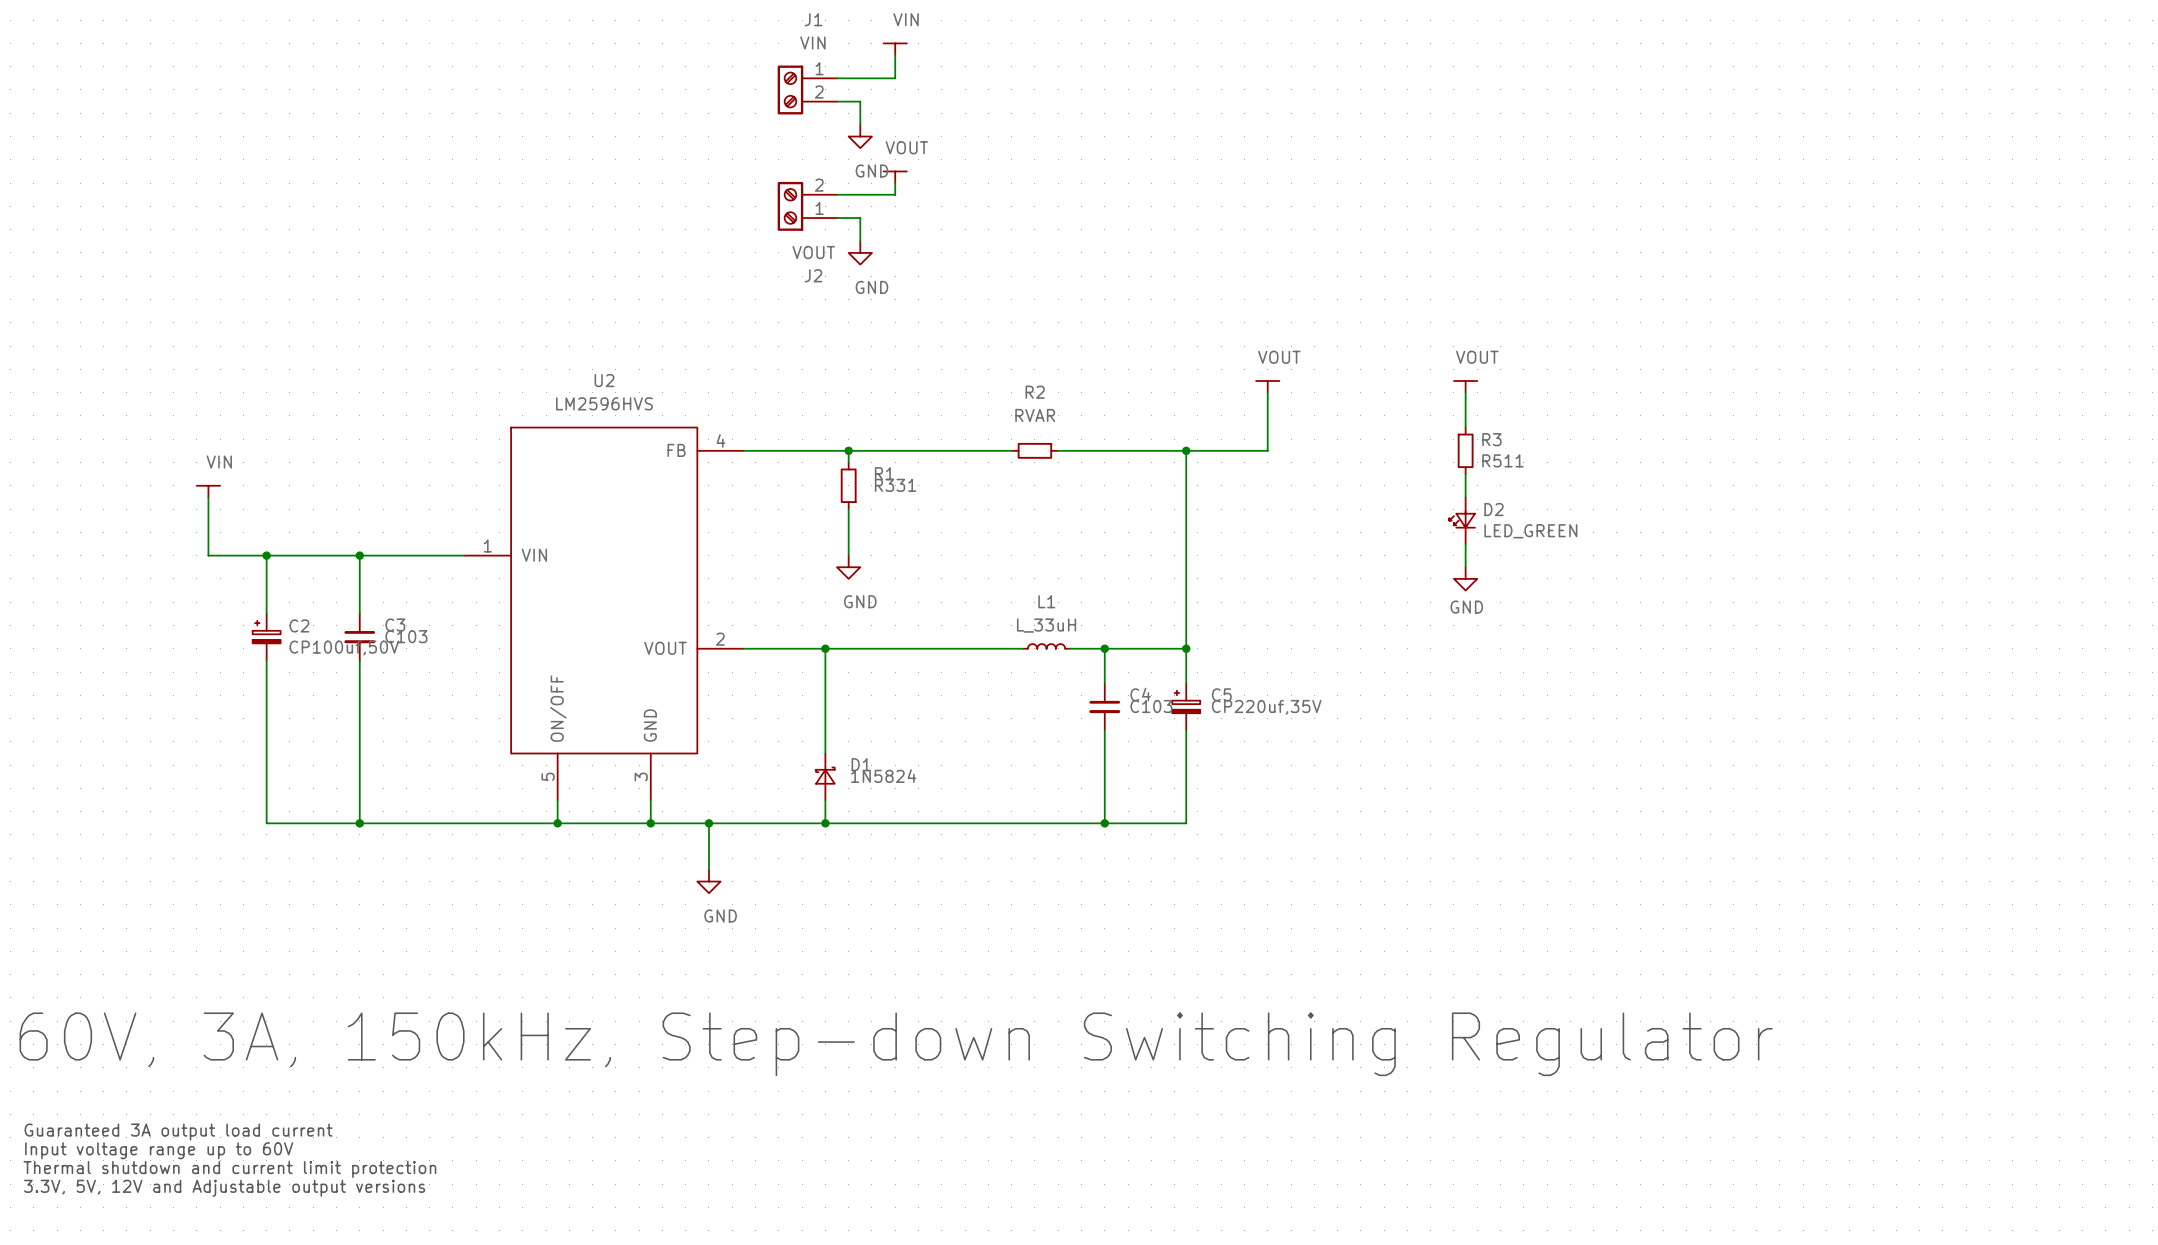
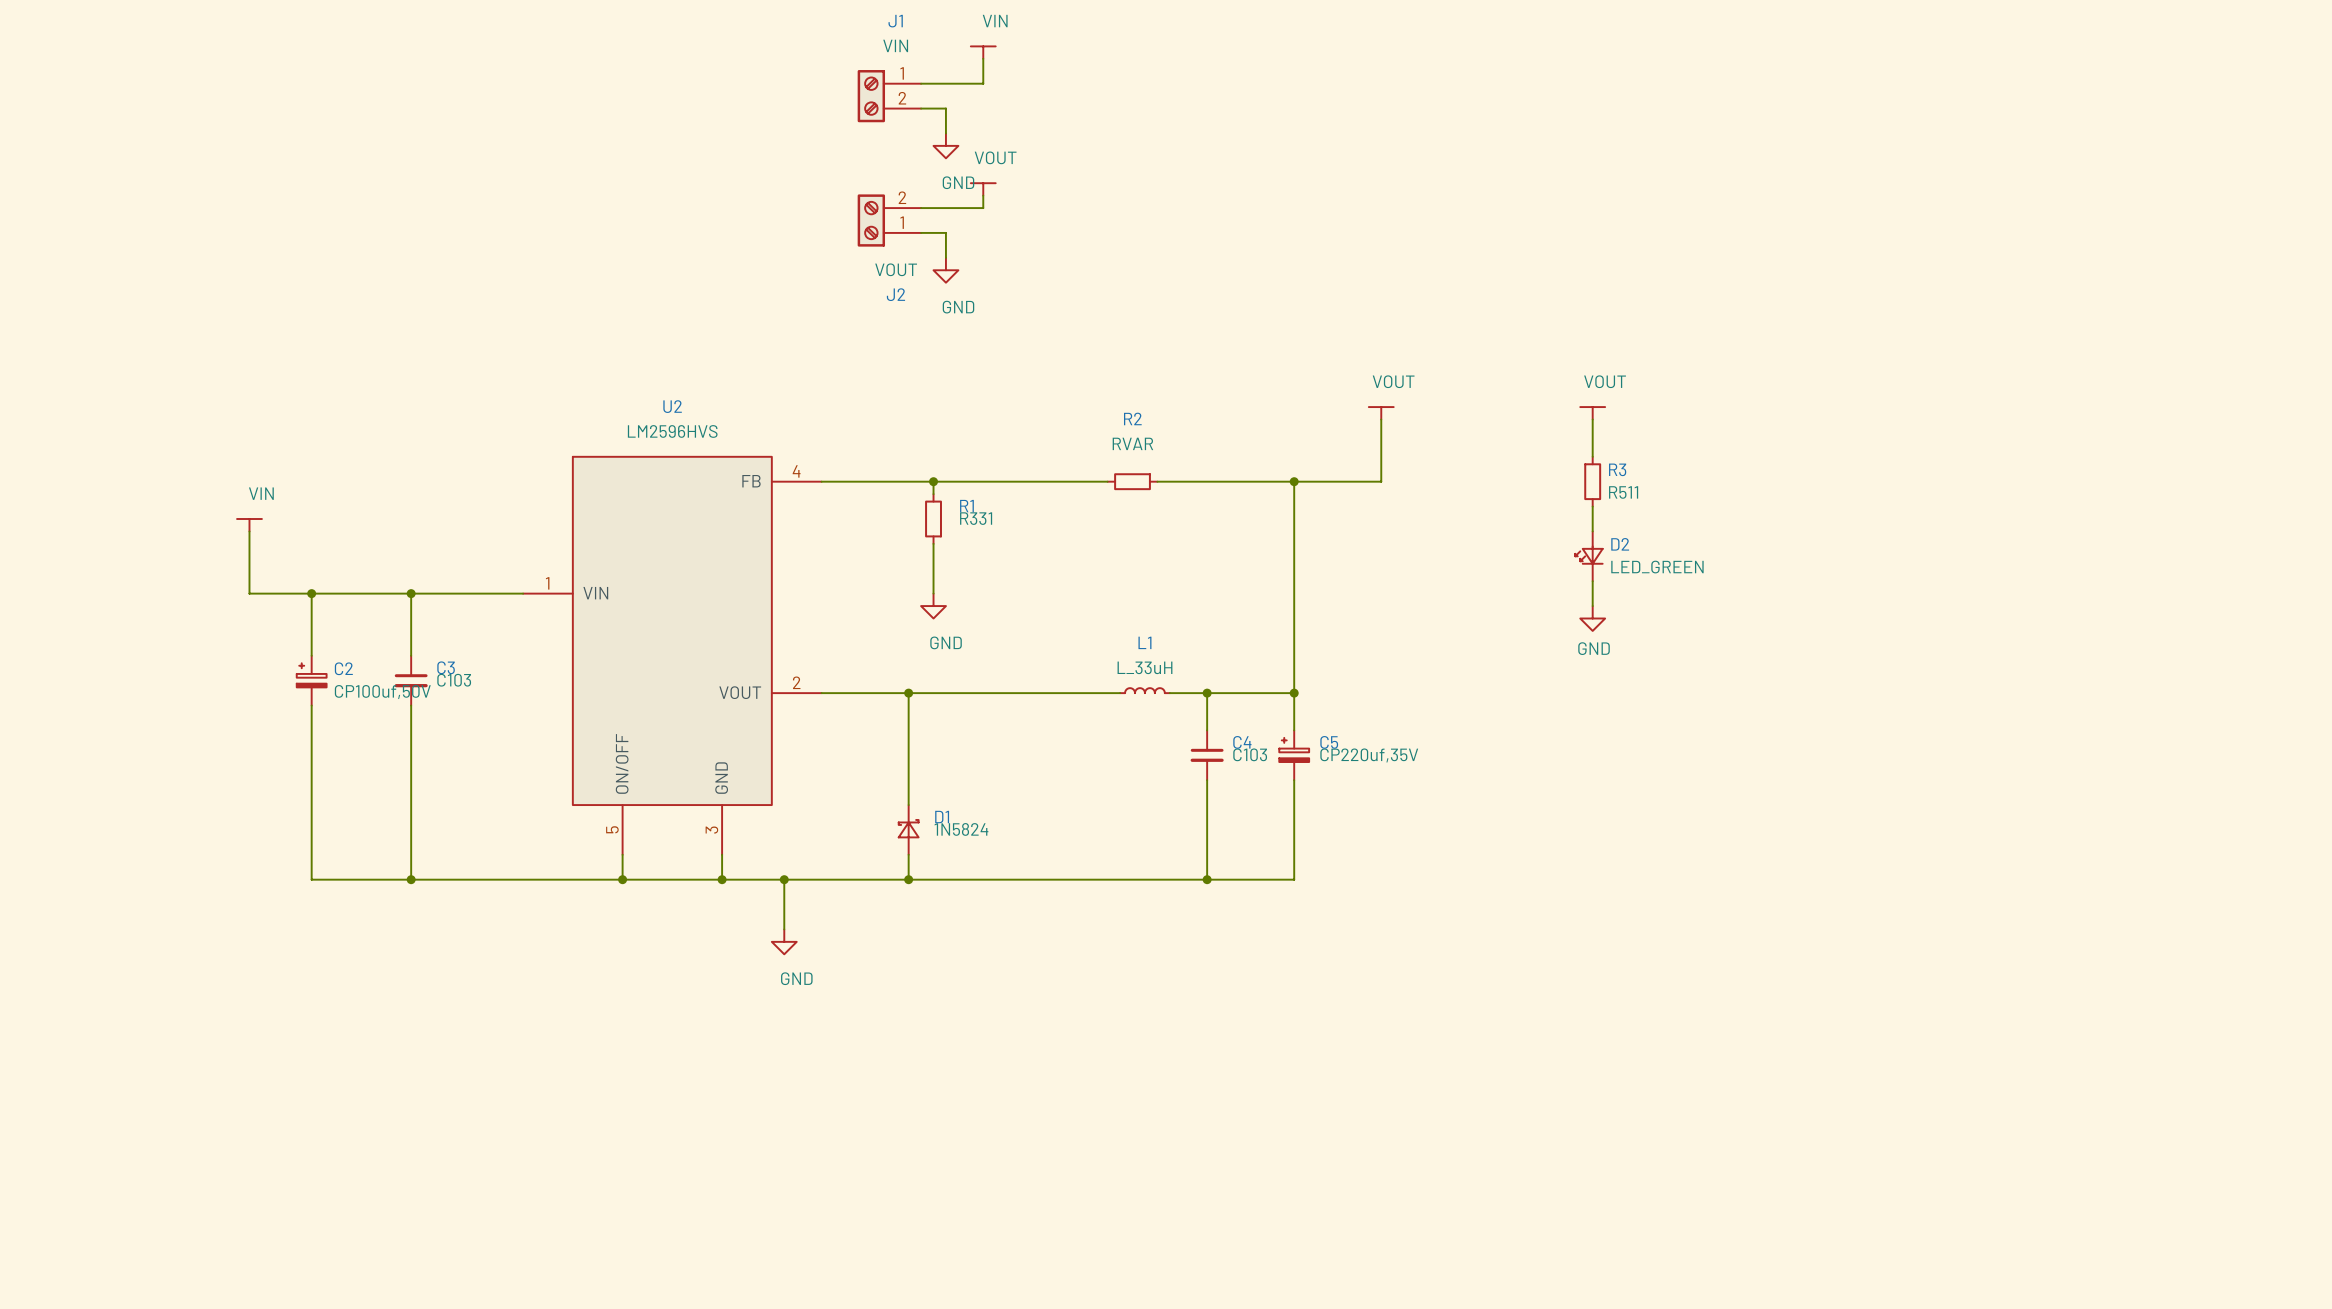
text: 60V, 3A, 150kHz, Step-down Switching Regulator (896, 1044) -> none
text: Guaranteed 3A output load current (178, 1132) -> none
text: Input voltage range up to 60V (159, 1150) -> none
text: Thermal shutdown and current limit protection (229, 1169) -> none
text: 3.3V, 5V, 12V and Adjustable output versions (224, 1188) -> none

